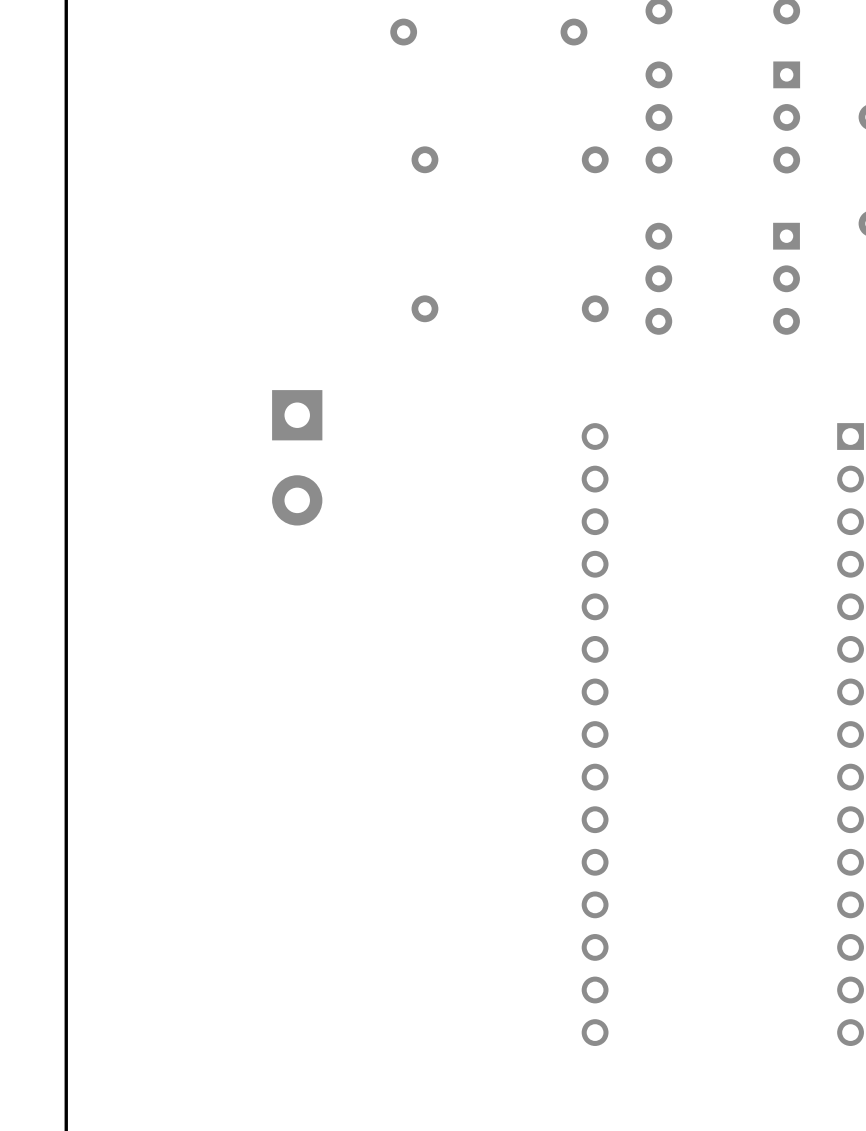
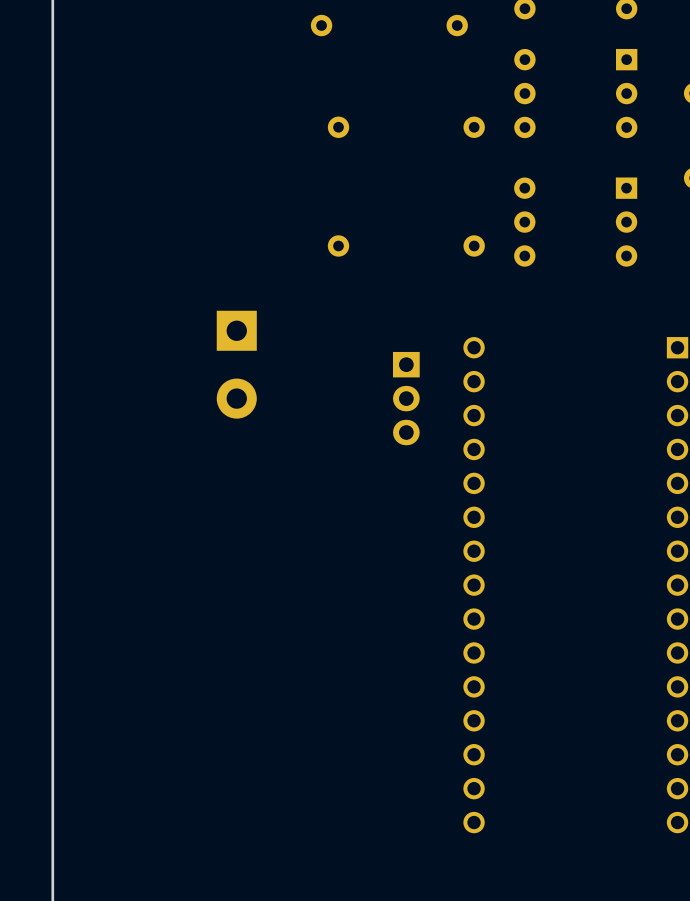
part: none -> (406, 398)

